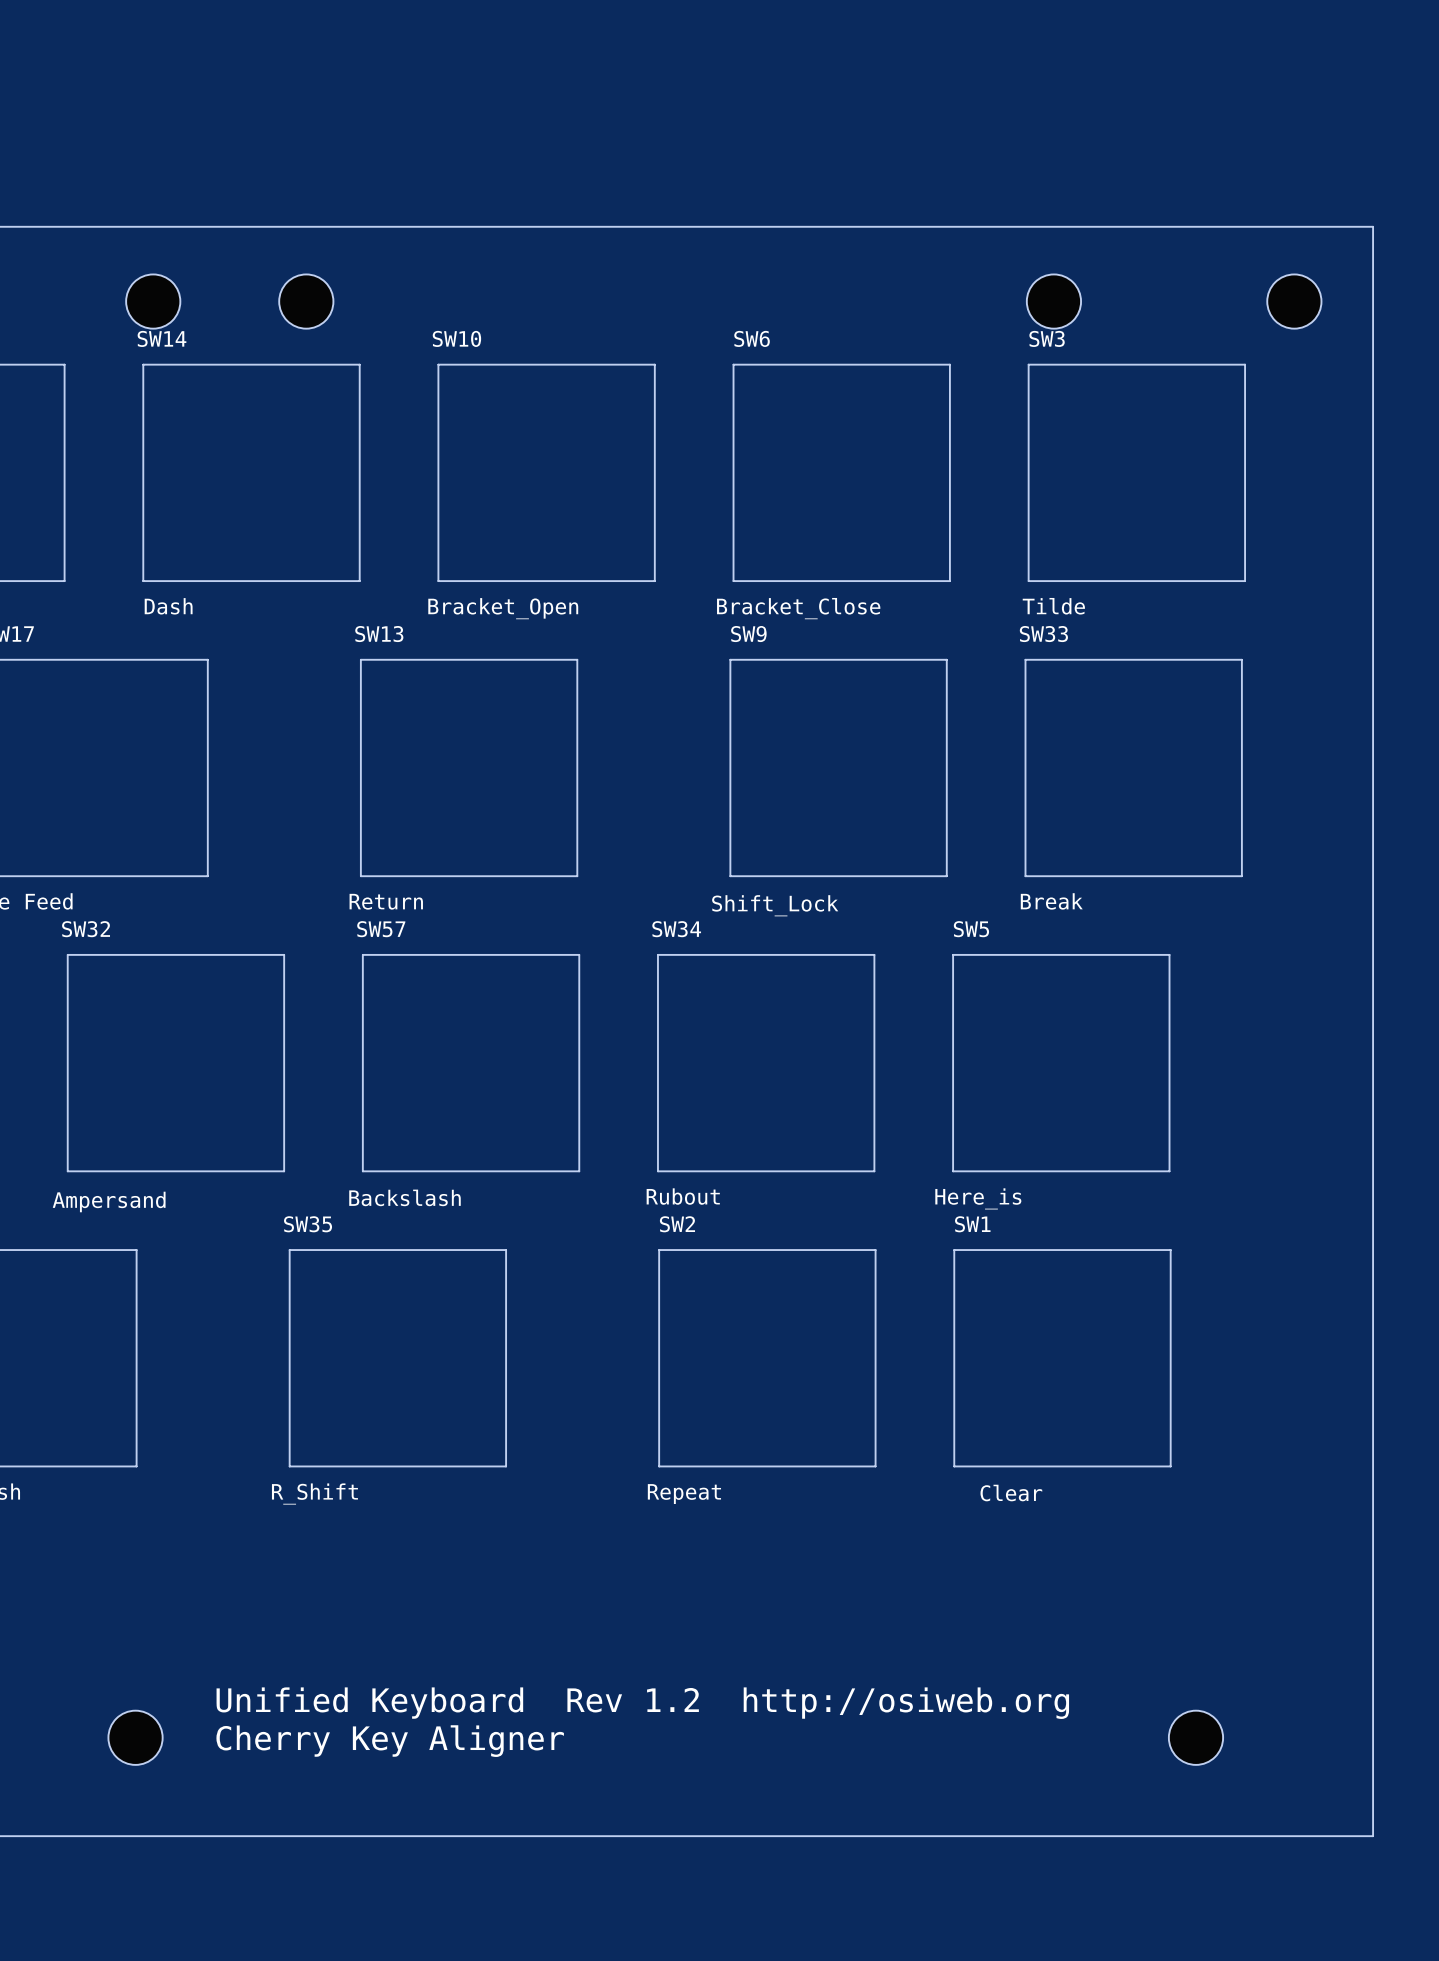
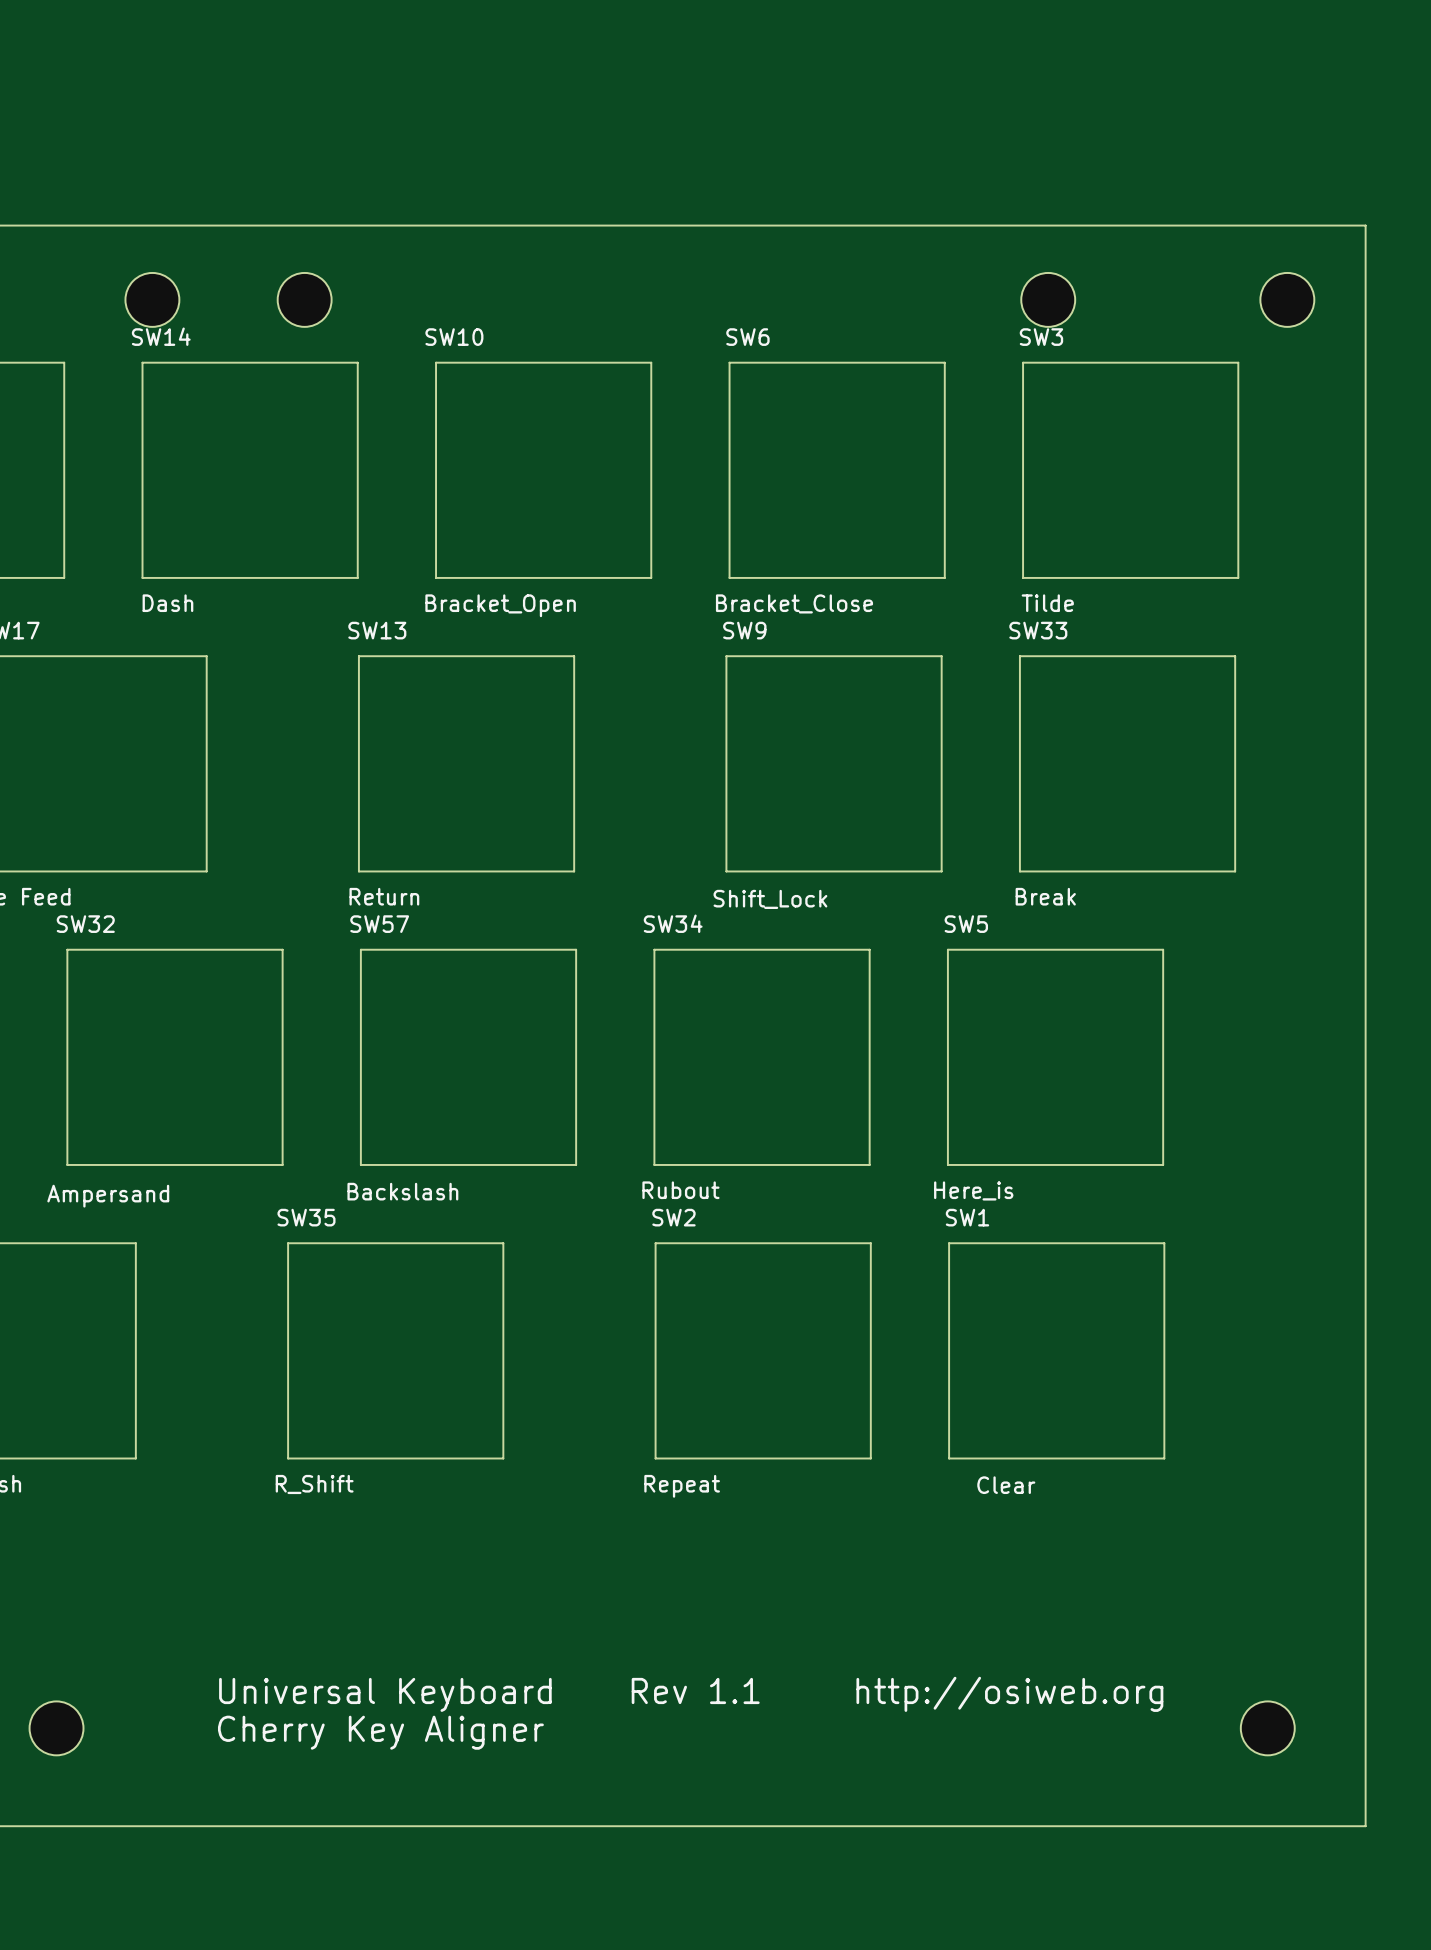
text: Unified Keyboard Rev 1.2 http://osiweb.org (642, 1703) -> Universal Keyboard Rev 1.1 http://osiweb.org (691, 1694)
part position: (135, 1737) -> (56, 1728)
part position: (1195, 1737) -> (1267, 1728)

